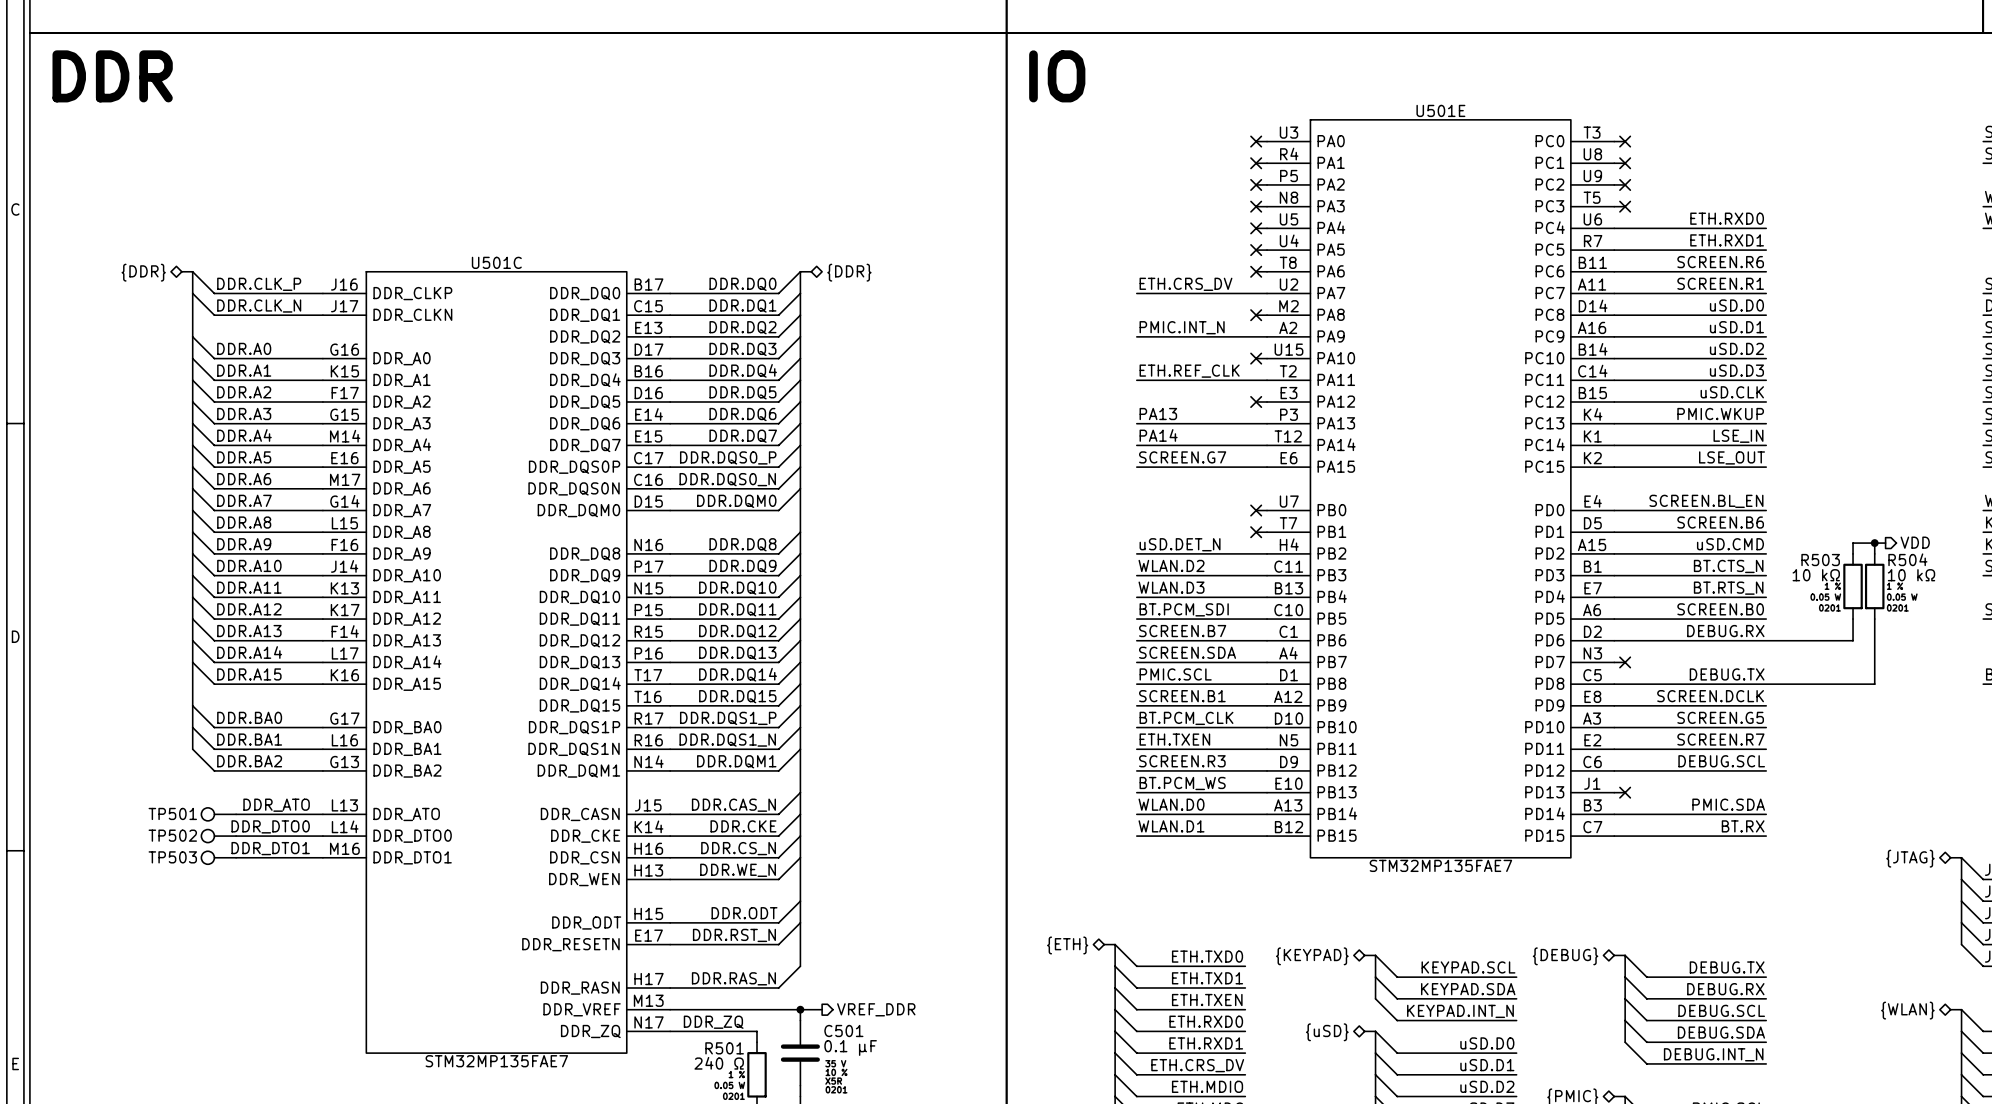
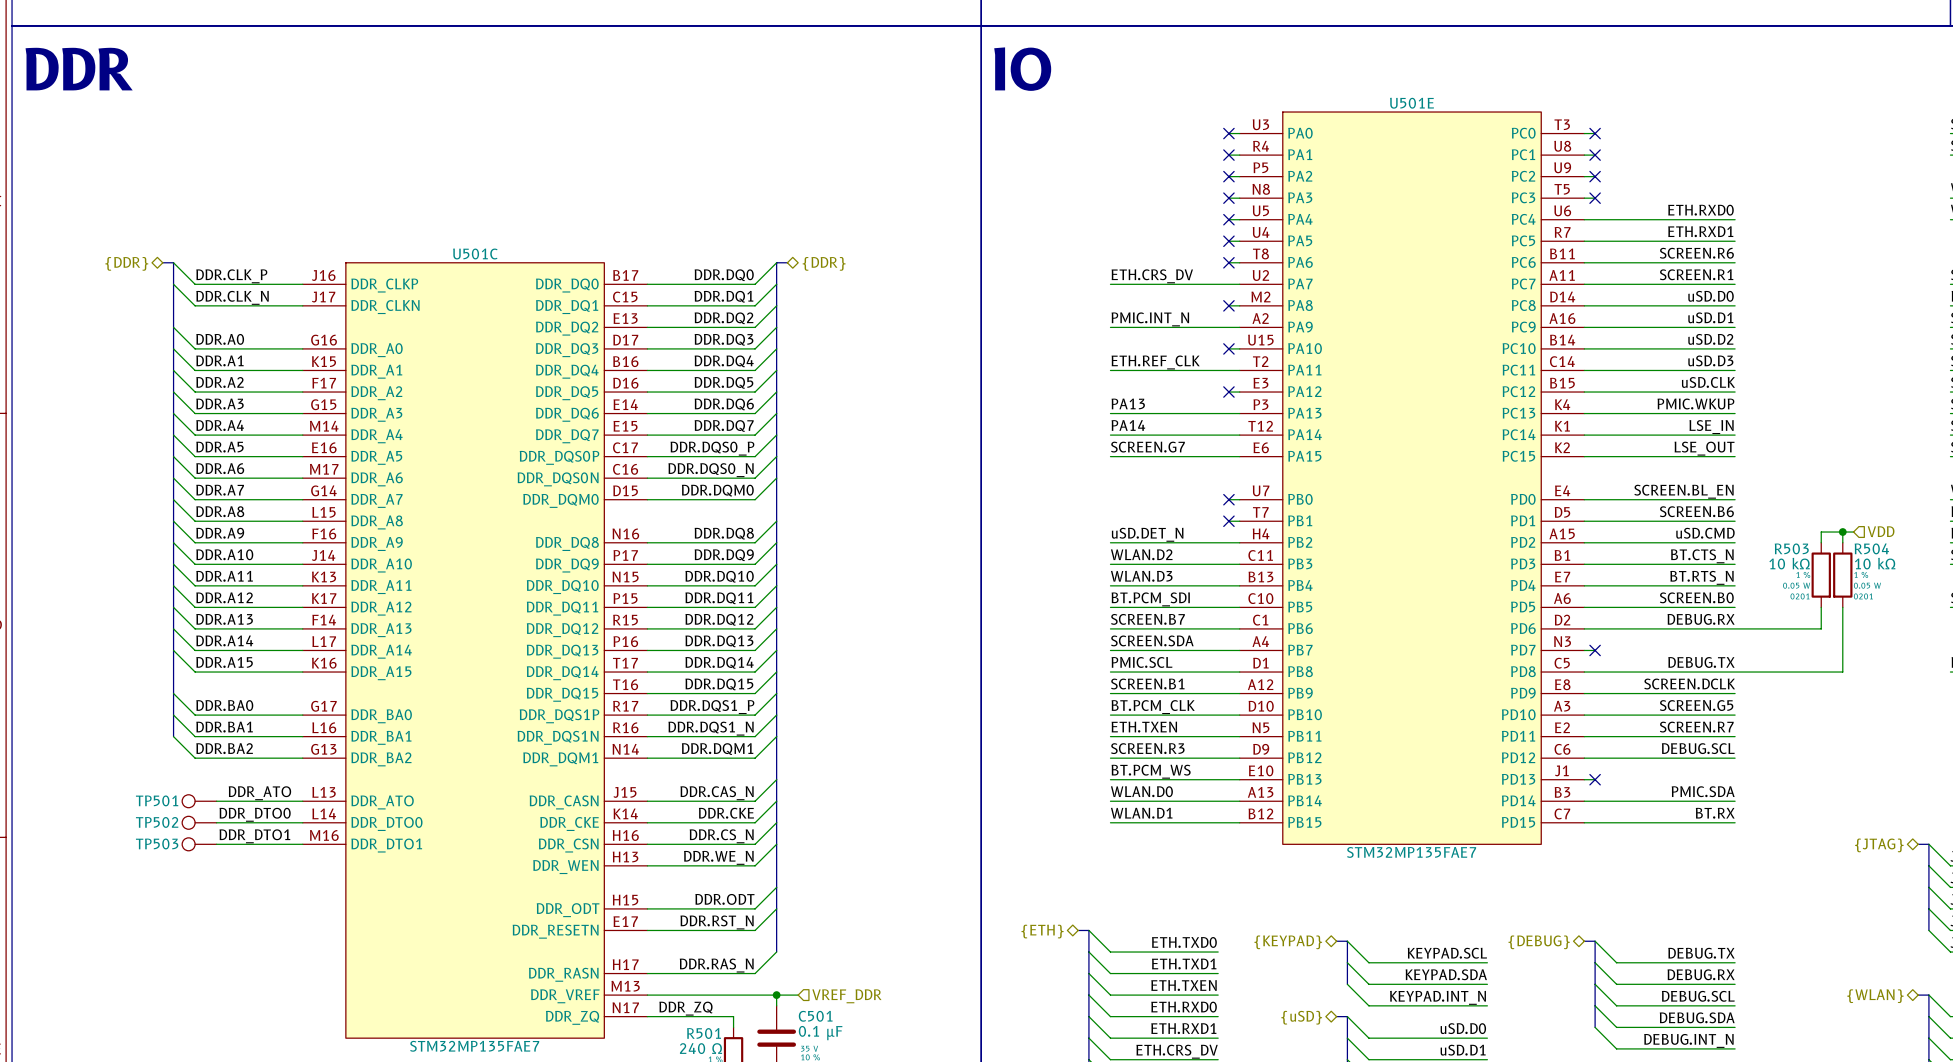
hierarchical label shape: output (1915, 542) -> input (1881, 531)
hierarchical label shape: output (876, 1009) -> input (846, 996)

